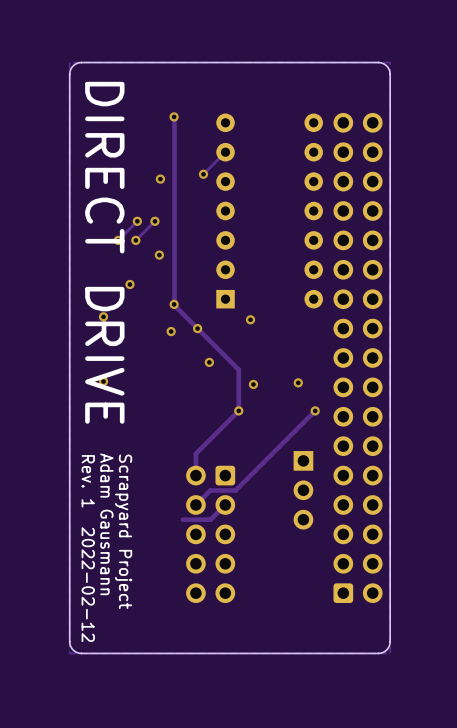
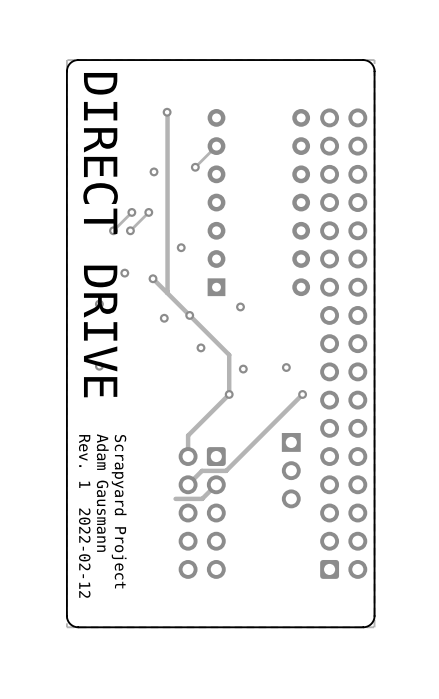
via: (159, 255) -> none
via: none -> (181, 247)
track: none -> (153, 278) (167, 292)
via: none -> (153, 278)
via: (174, 304) -> none

